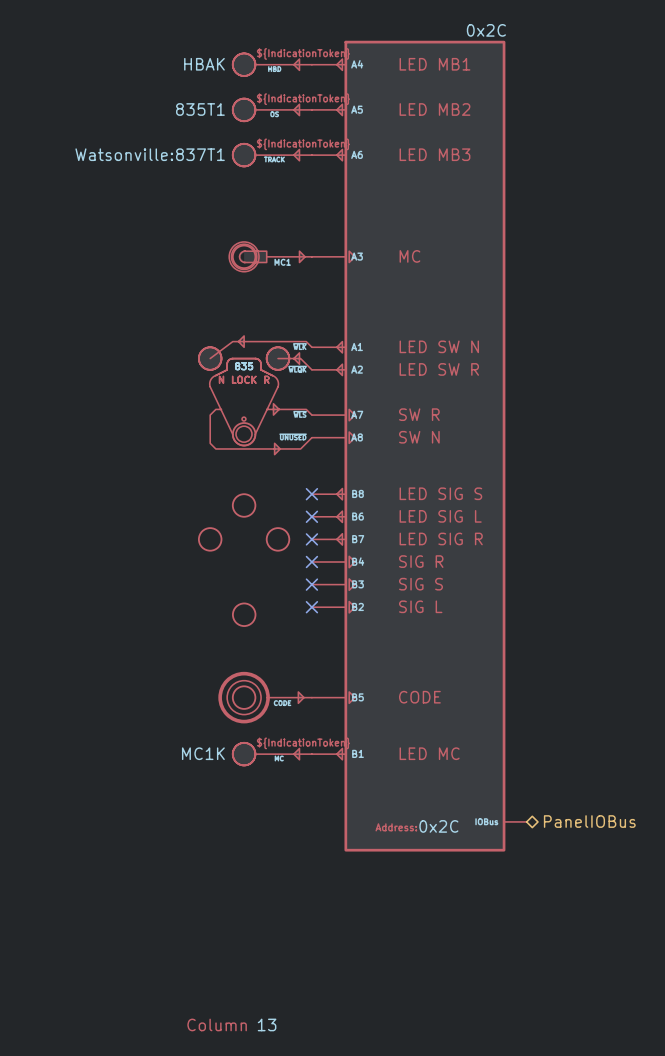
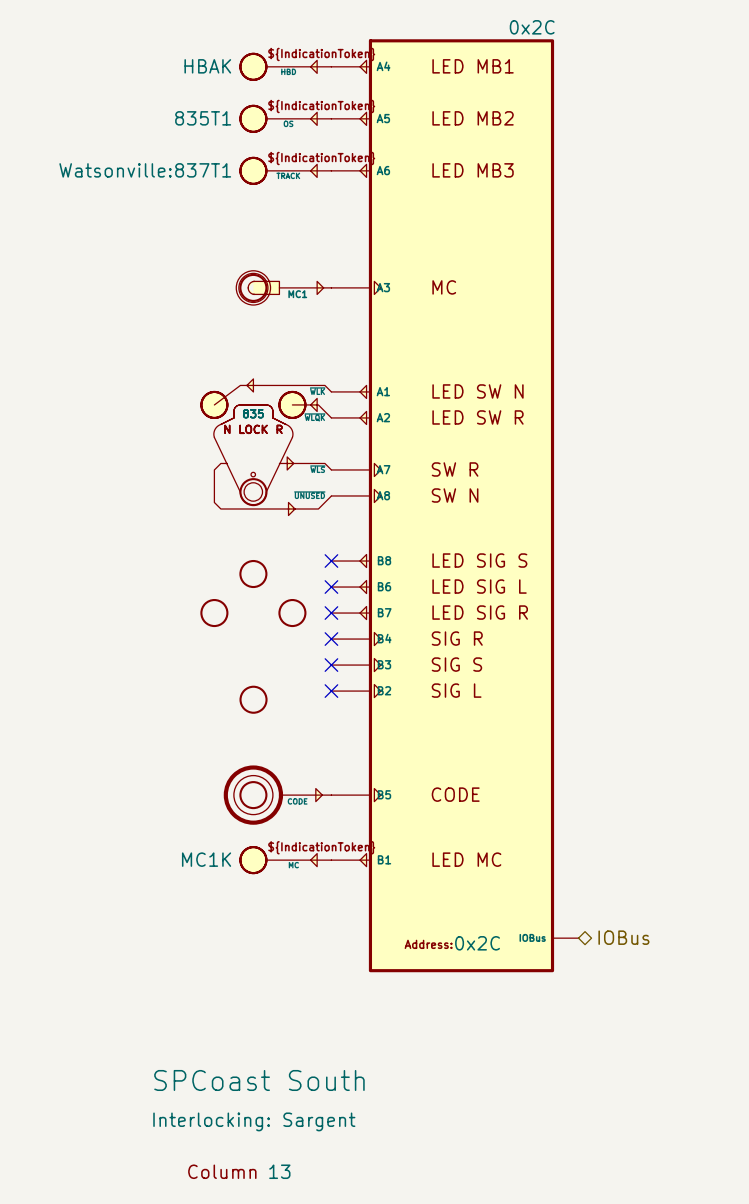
hierarchical label: PanelIOBus (589, 821) -> IOBus (623, 937)
part text: none -> SPCoast South (259, 1080)
part text: none -> Interlocking: Sargent (254, 1121)

